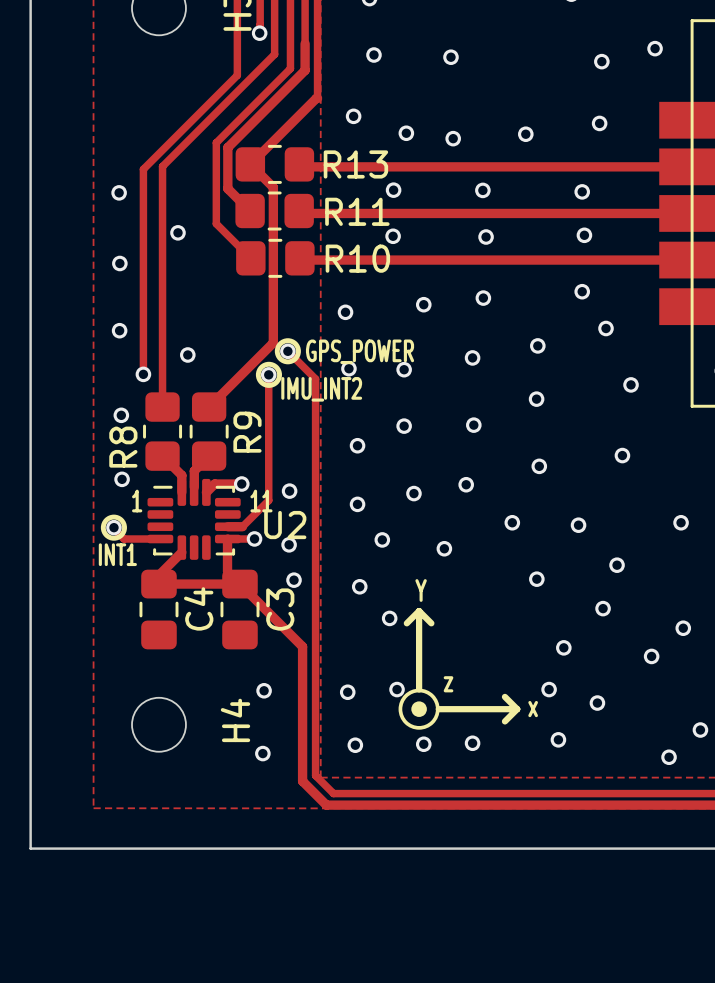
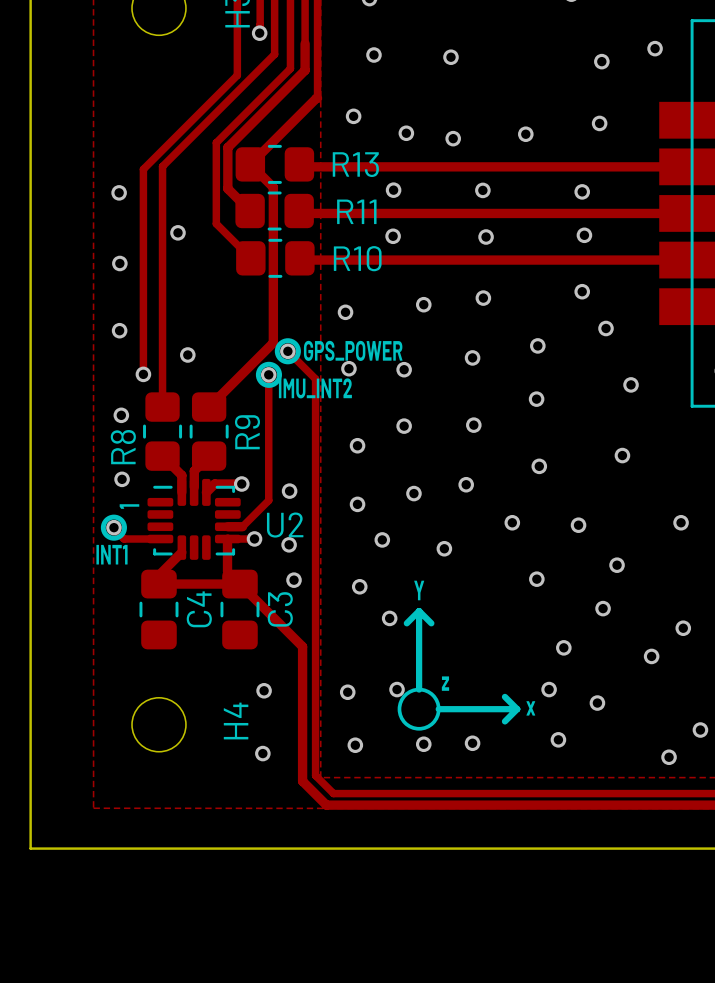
text rotation: 0° (137, 501) -> 90° counterclockwise (129, 506)
text: 11 (261, 501) -> none
drawing: none -> [397, 687, 441, 731]
drawing: [398, 688, 440, 730] -> none

